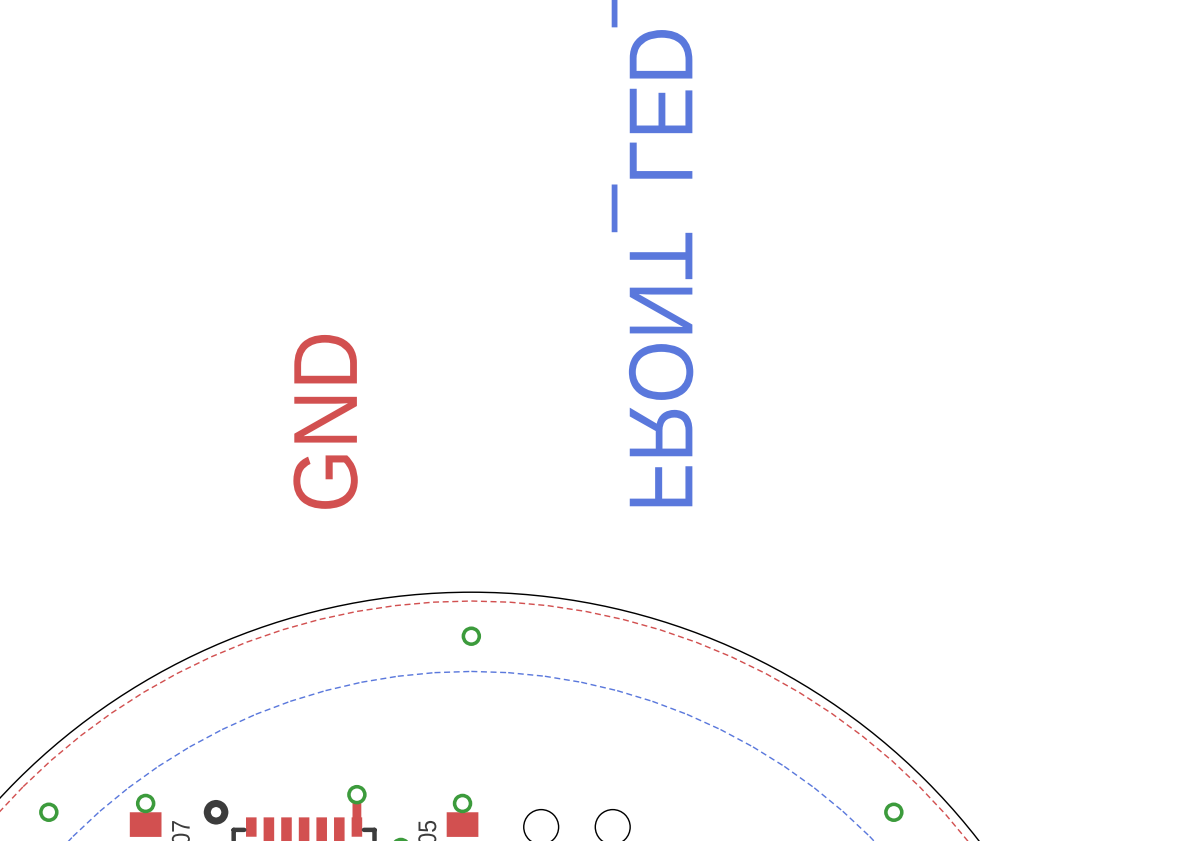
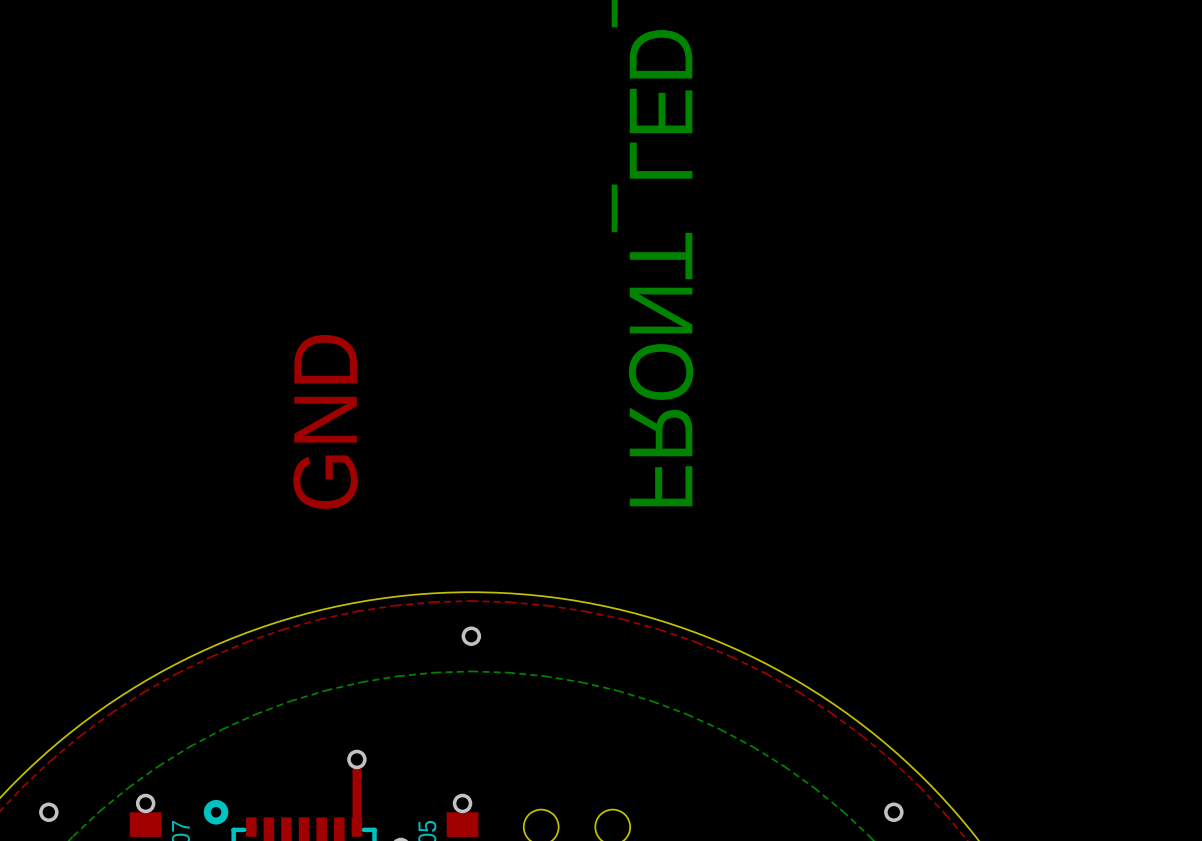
top track: none -> (356, 759) (356, 794)
via position: (356, 794) -> (356, 759)

